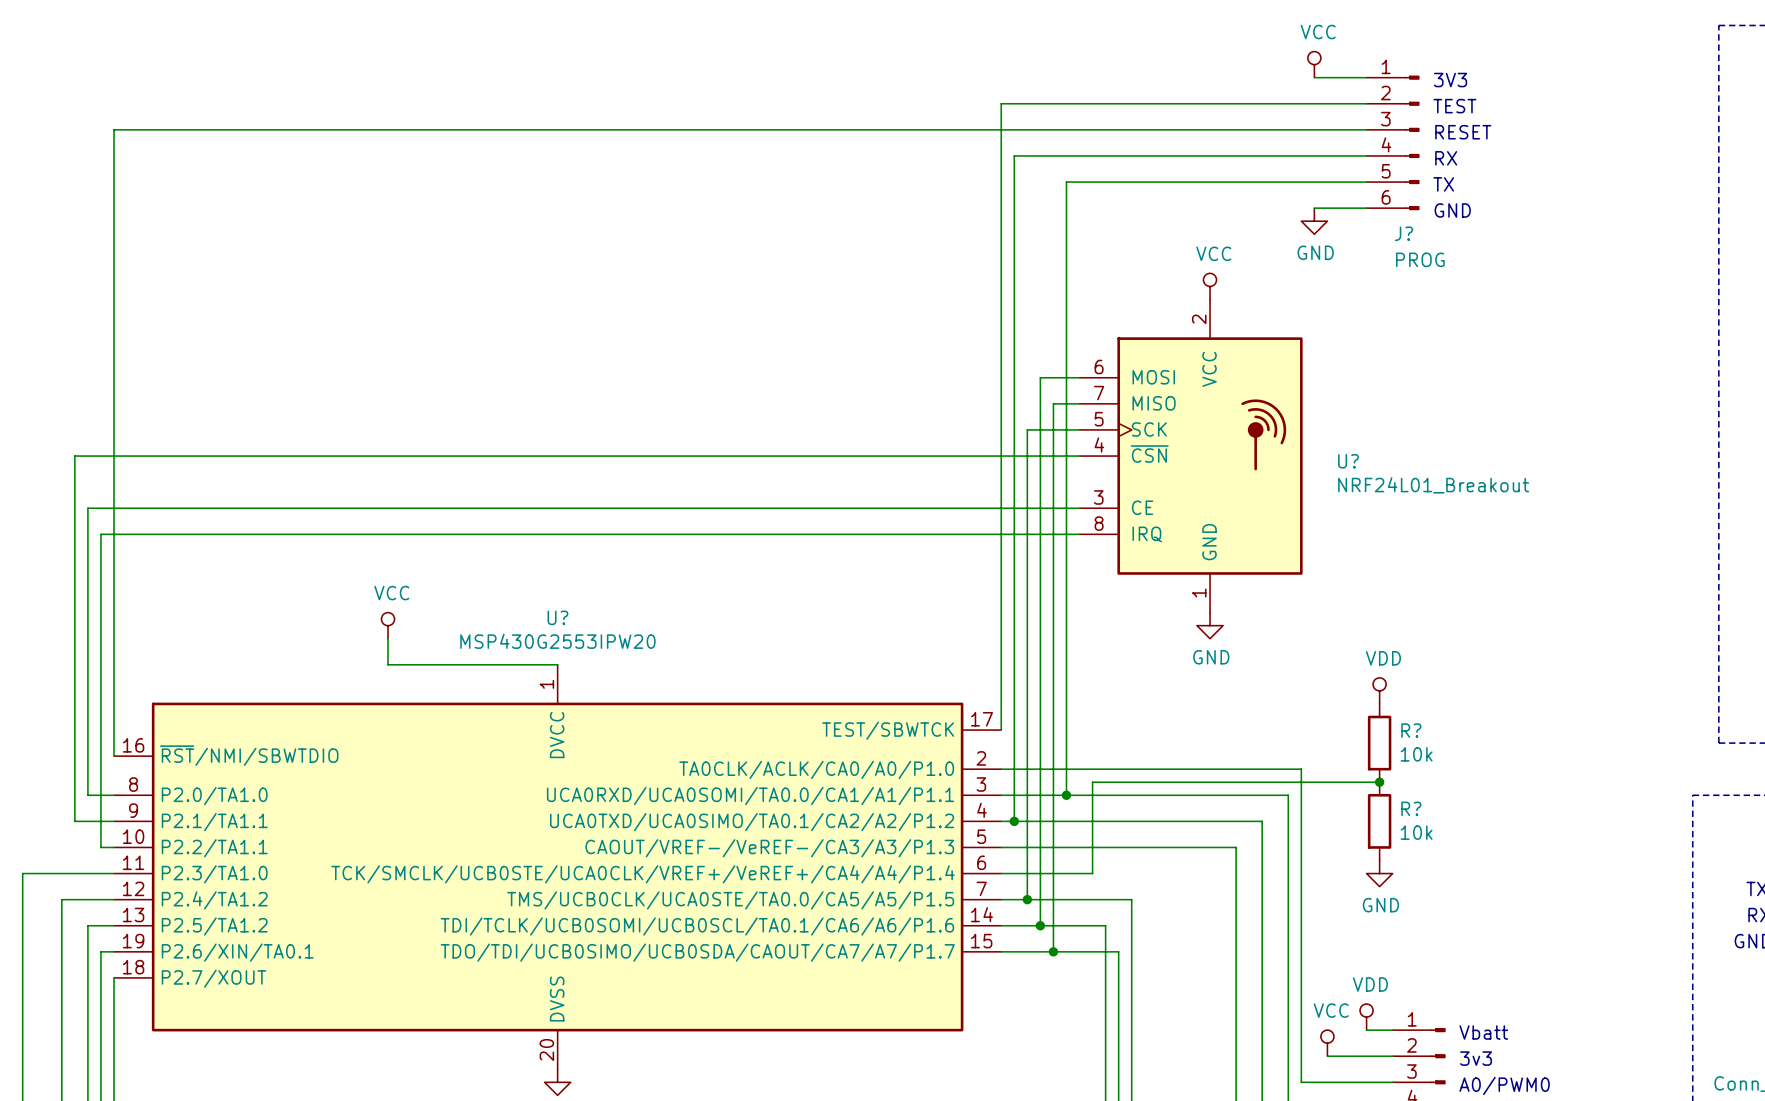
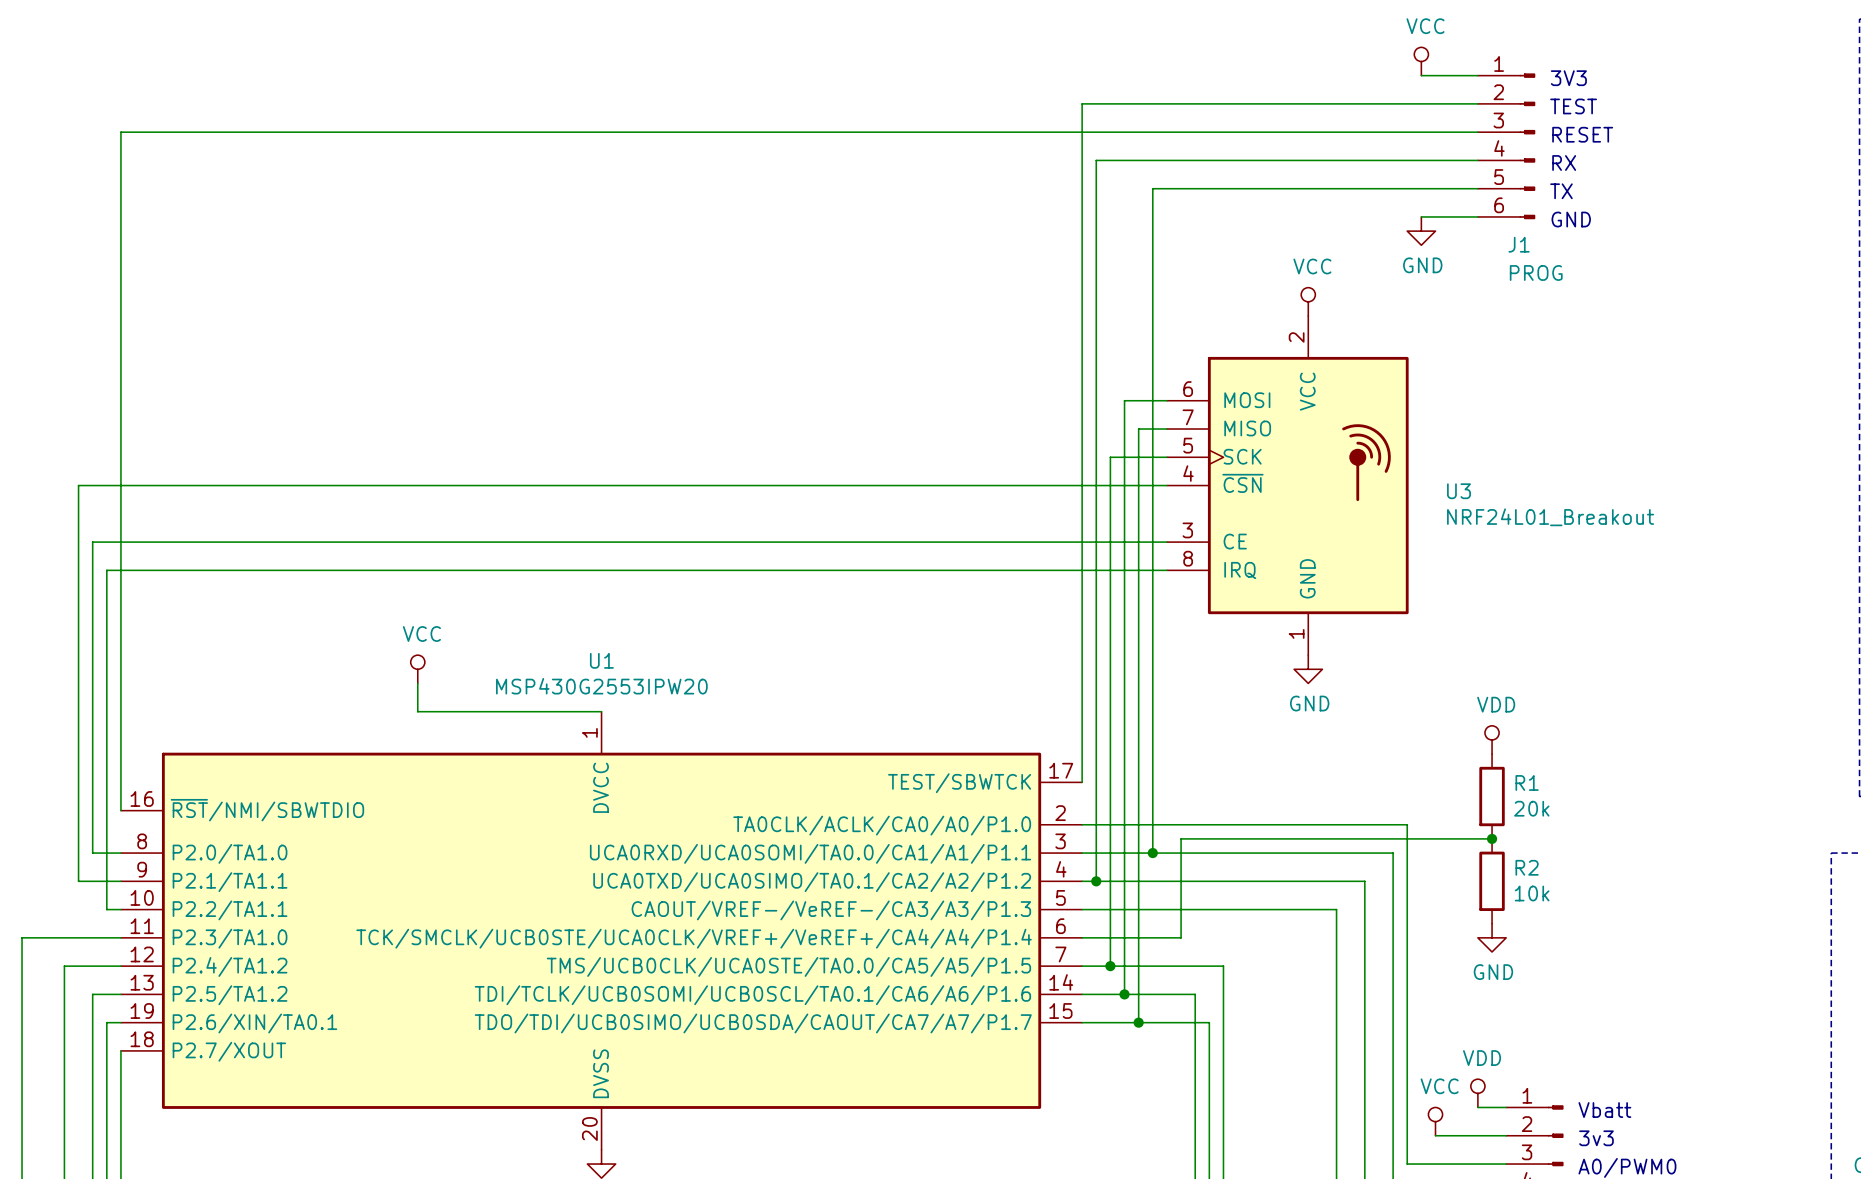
J? name: J? (1403, 233) -> J1 (1519, 244)
U? name: U? (1348, 461) -> U3 (1459, 491)
U? name: U? (557, 617) -> U1 (601, 660)
R? name: R? (1411, 730) -> R1 (1527, 782)
R? value: 10k (1416, 754) -> 20k (1531, 808)
R? name: R? (1411, 808) -> R2 (1527, 867)

